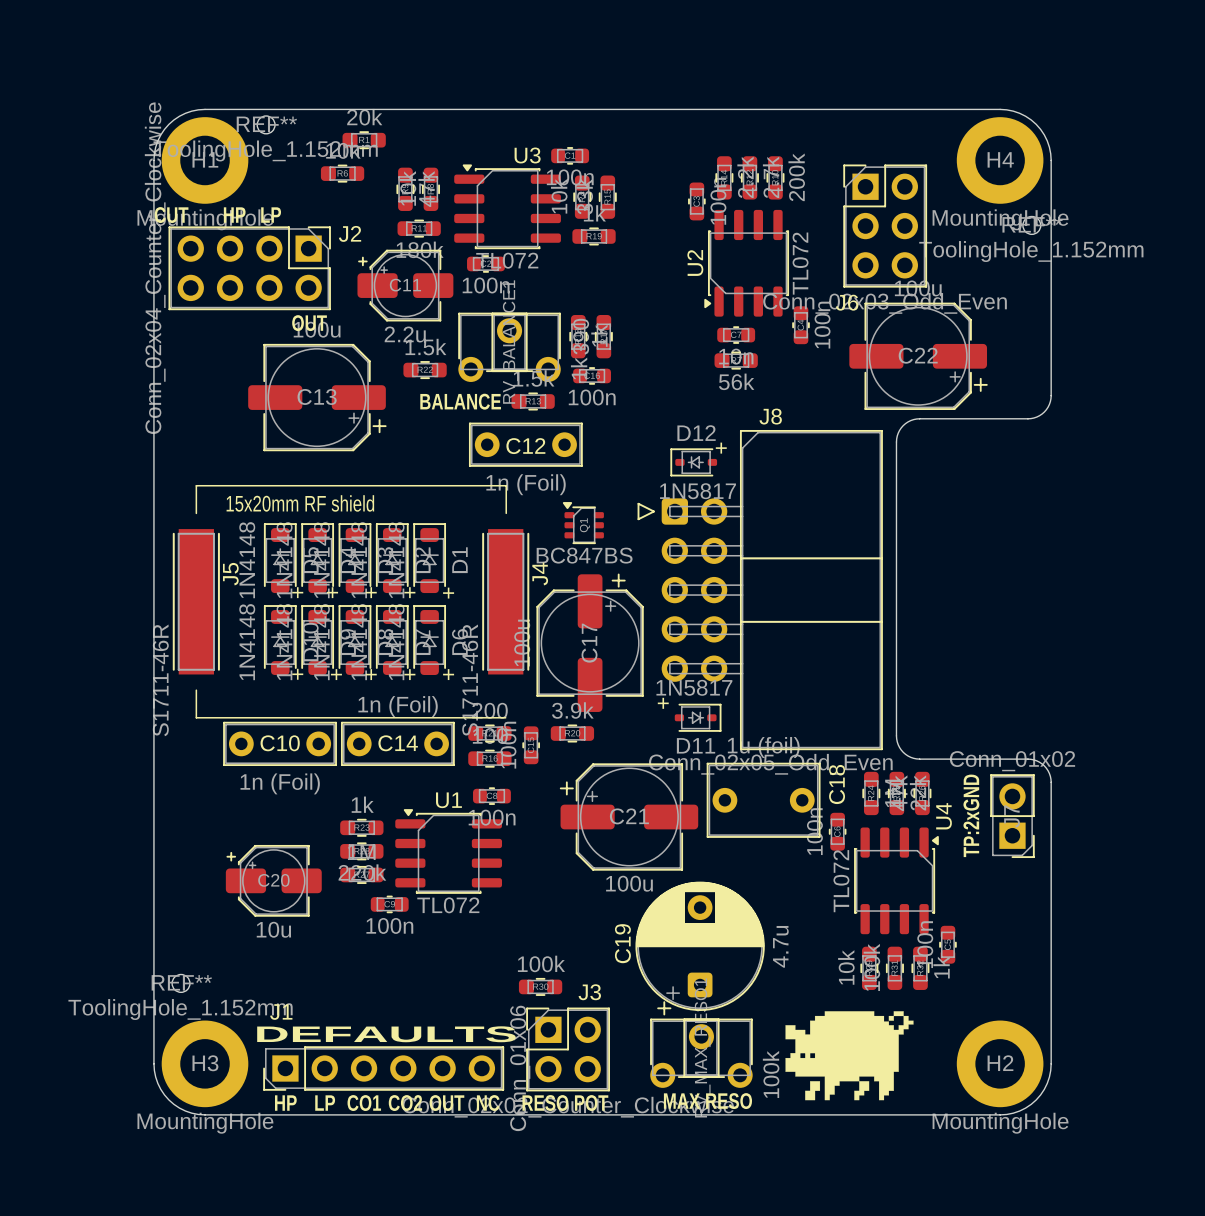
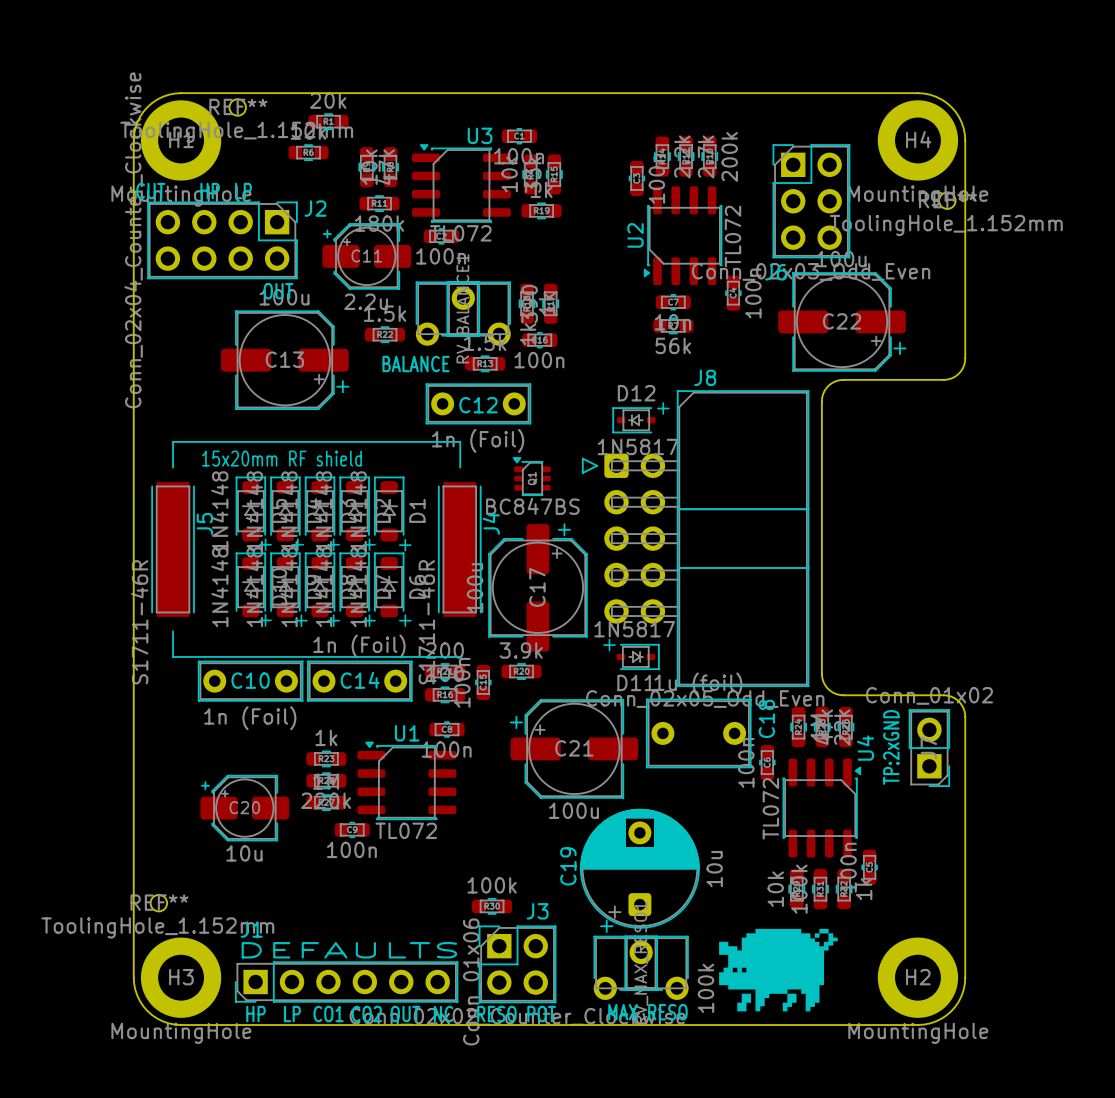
C19 value: 4.7u (780, 946) -> 10u (714, 869)

